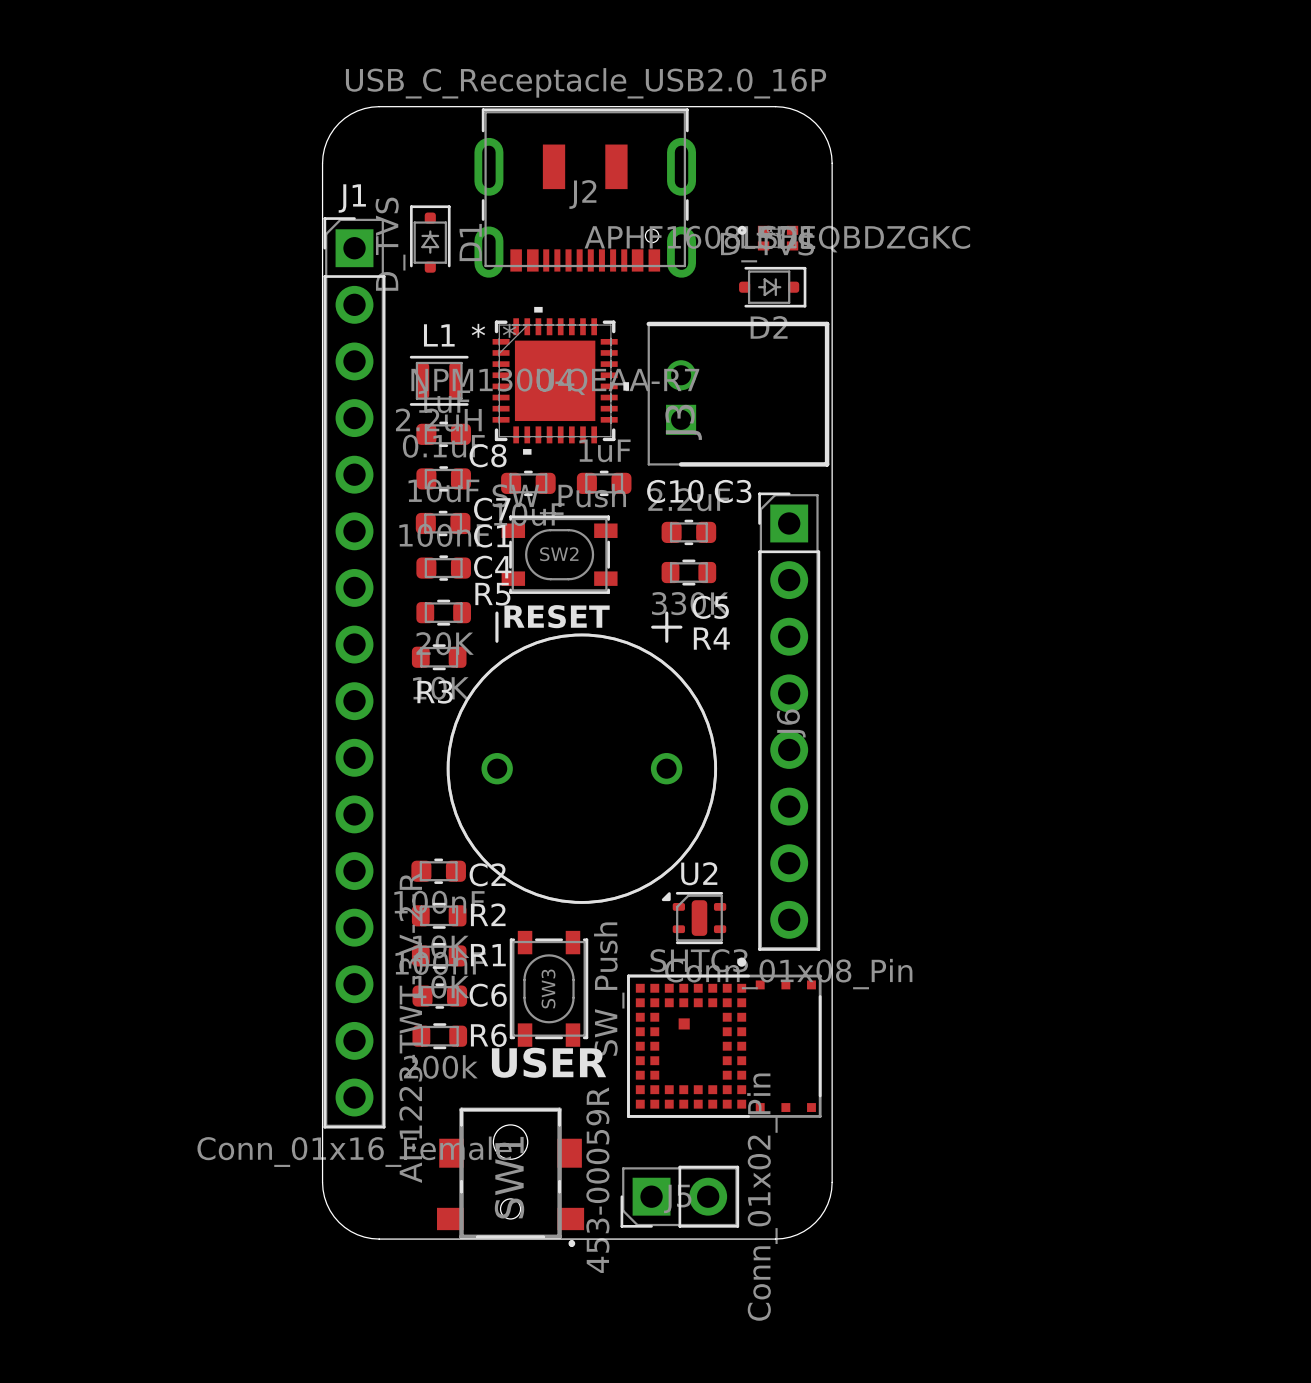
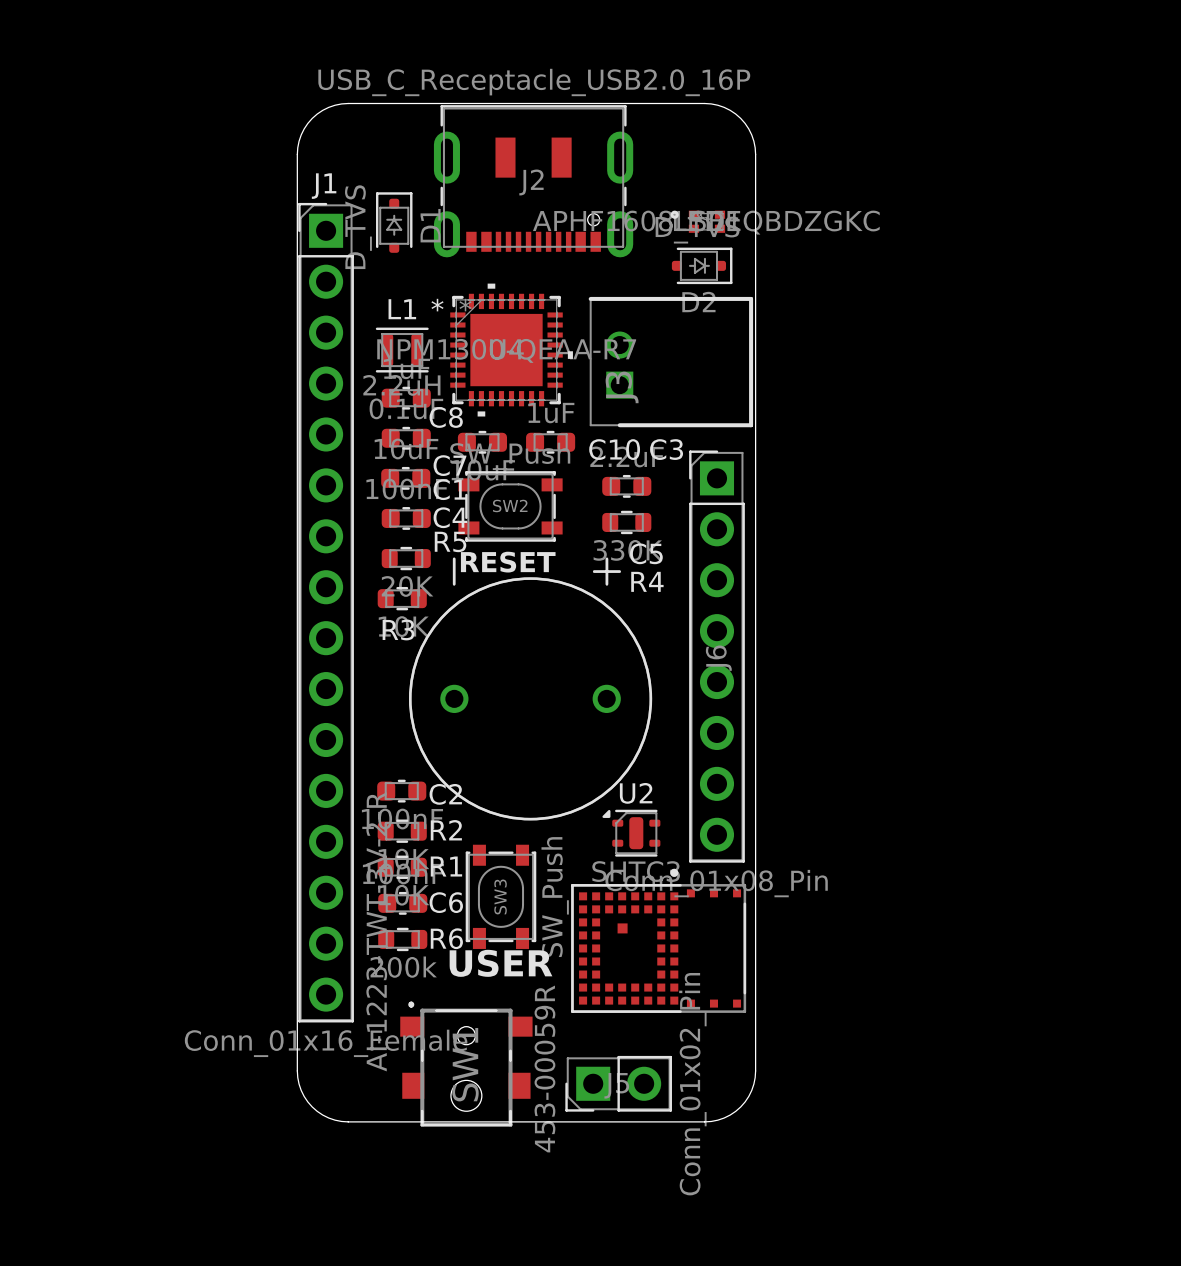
SW1 rotation: 0° (510, 1177) -> 180° (466, 1064)

